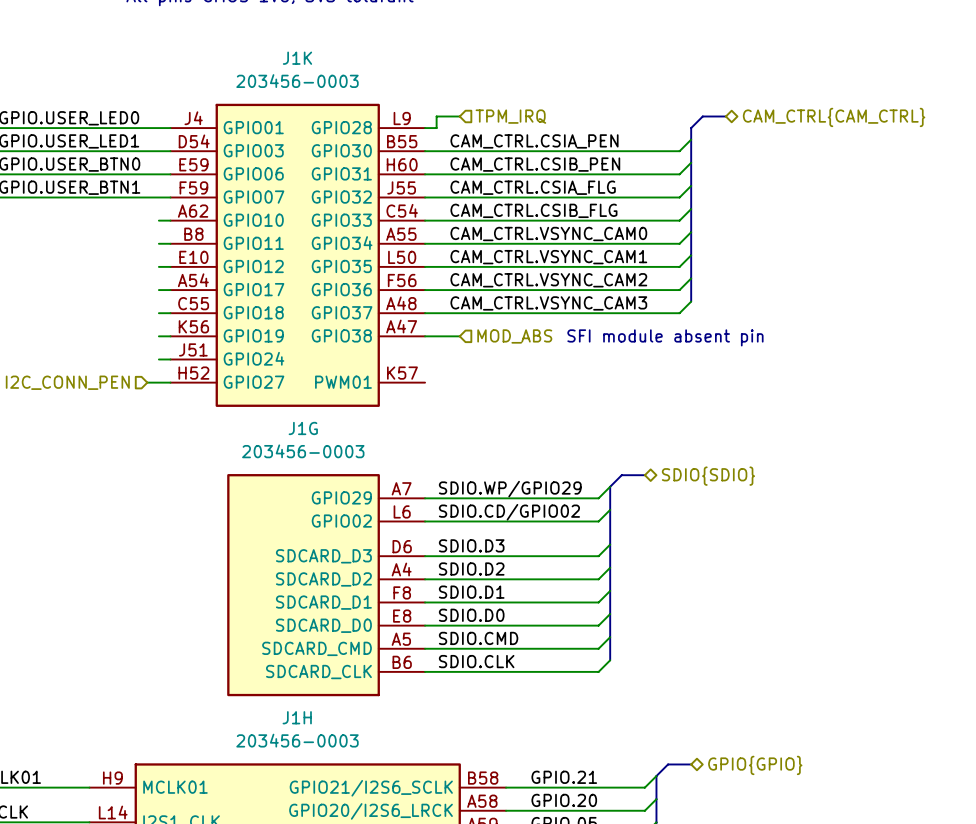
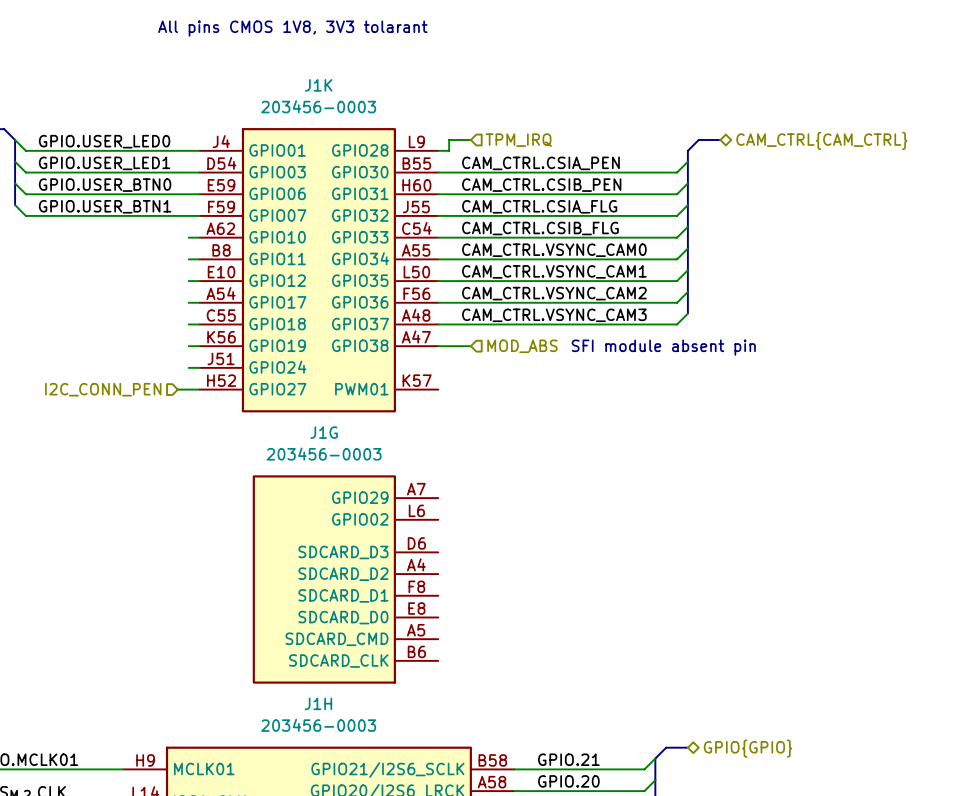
bus: (644, 475) (621, 475) (610, 486) (610, 660) -> none
hierarchical label: SDIO{SDIO} (708, 476) -> none
wire: (610, 486) (598, 498) (425, 498) -> none
label: SDIO.WP/GPIO29 (510, 489) -> none
wire: (610, 509) (598, 521) (425, 521) -> none
label: SDIO.CD/GPIO02 (509, 512) -> none
wire: (610, 544) (598, 556) (425, 556) -> none
label: SDIO.D3 (471, 545) -> none
wire: (610, 567) (598, 579) (425, 579) -> none
label: SDIO.D2 (471, 569) -> none
wire: (610, 590) (598, 602) (425, 602) -> none
label: SDIO.D1 (471, 592) -> none
wire: (610, 614) (598, 625) (425, 625) -> none
label: SDIO.D0 (471, 615) -> none
wire: (610, 637) (598, 648) (425, 648) -> none
label: SDIO.CMD (478, 638) -> none
wire: (610, 660) (598, 671) (425, 671) -> none
label: SDIO.CLK (476, 661) -> none

